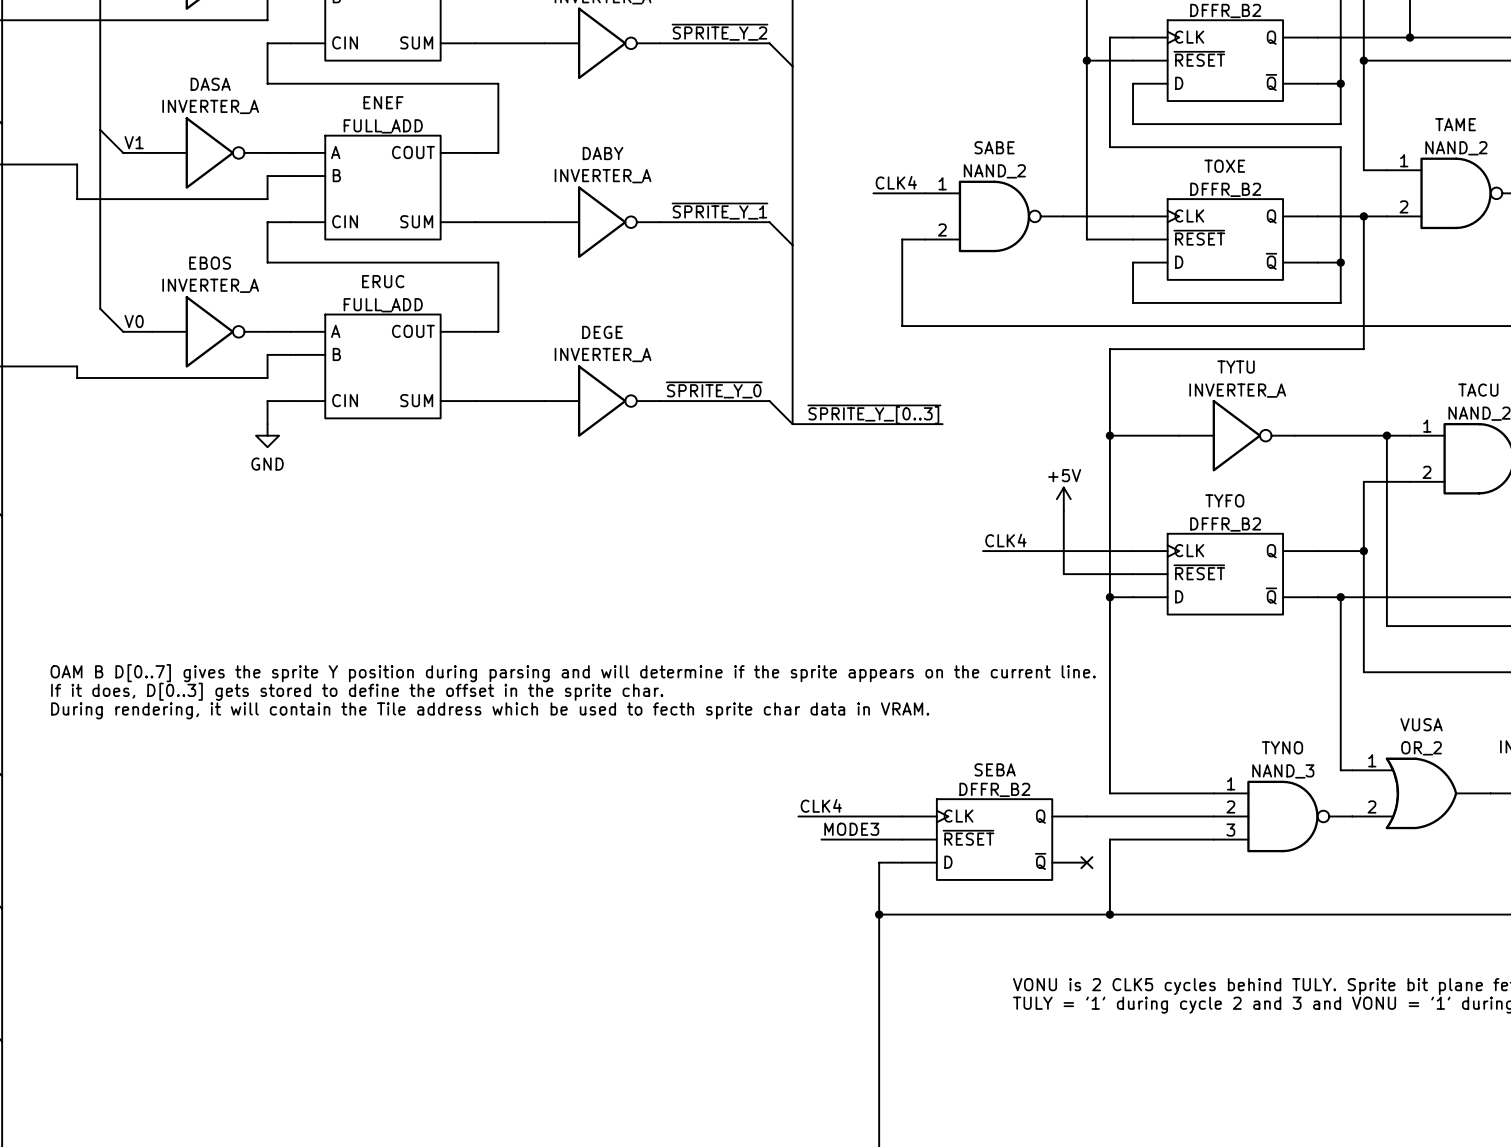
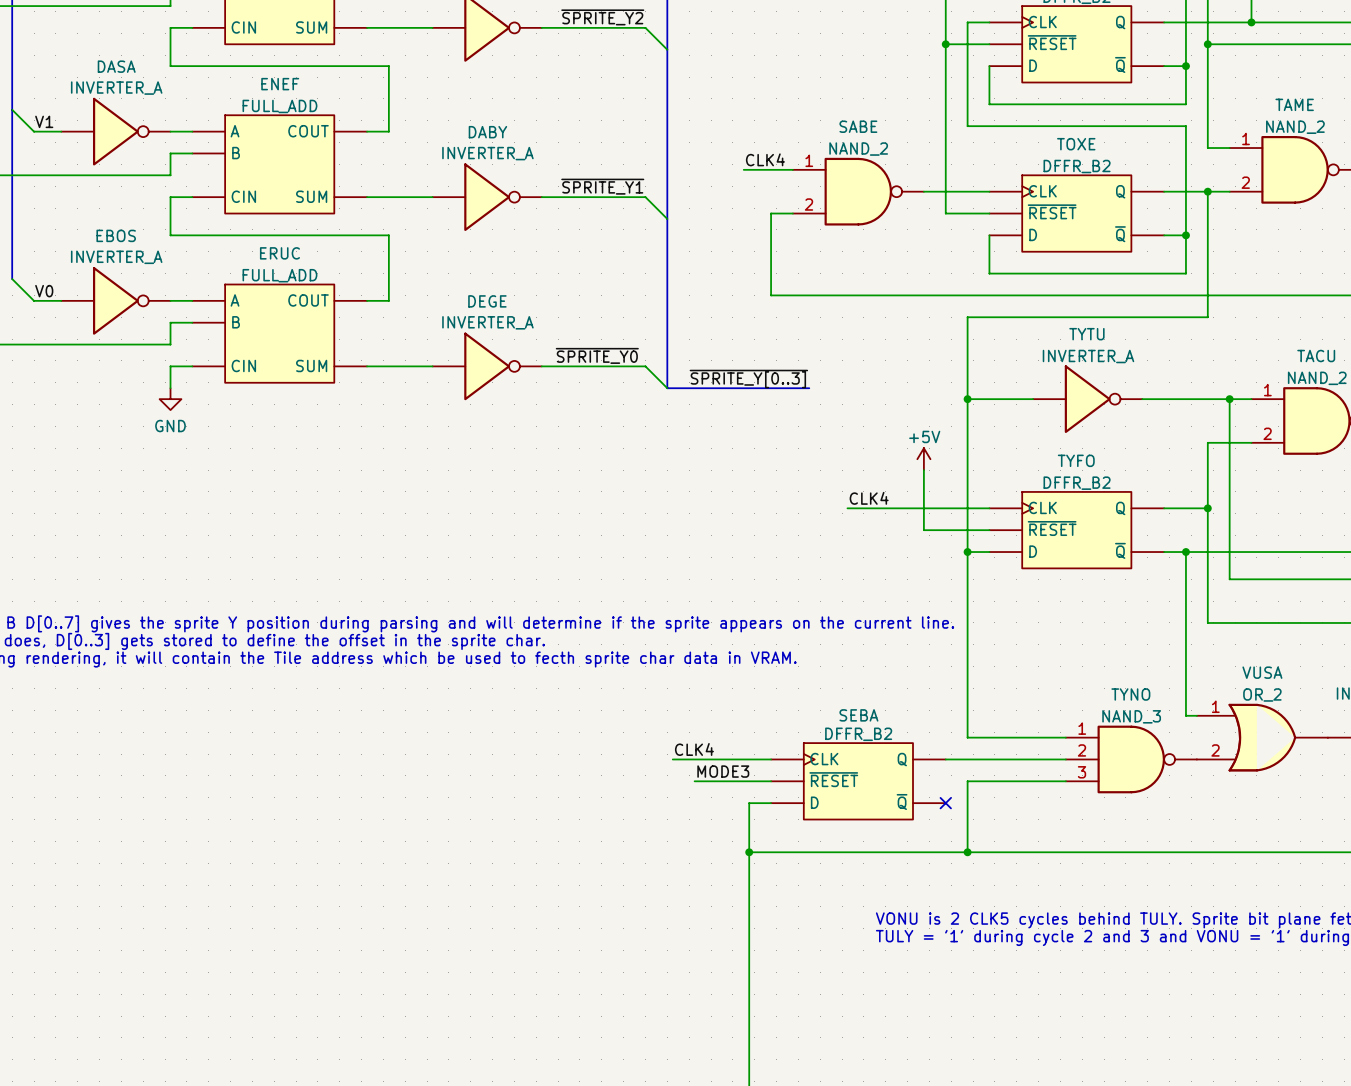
label: ~{SPRITE_Y_2} (719, 32) -> ~{SPRITE_Y2} (602, 17)
label: ~{SPRITE_Y_1} (719, 211) -> ~{SPRITE_Y1} (602, 186)
label: ~{SPRITE_Y_0} (714, 389) -> ~{SPRITE_Y0} (597, 355)
label: ~{SPRITE_Y_[0..3]} (874, 414) -> ~{SPRITE_Y[0..3]} (748, 379)

